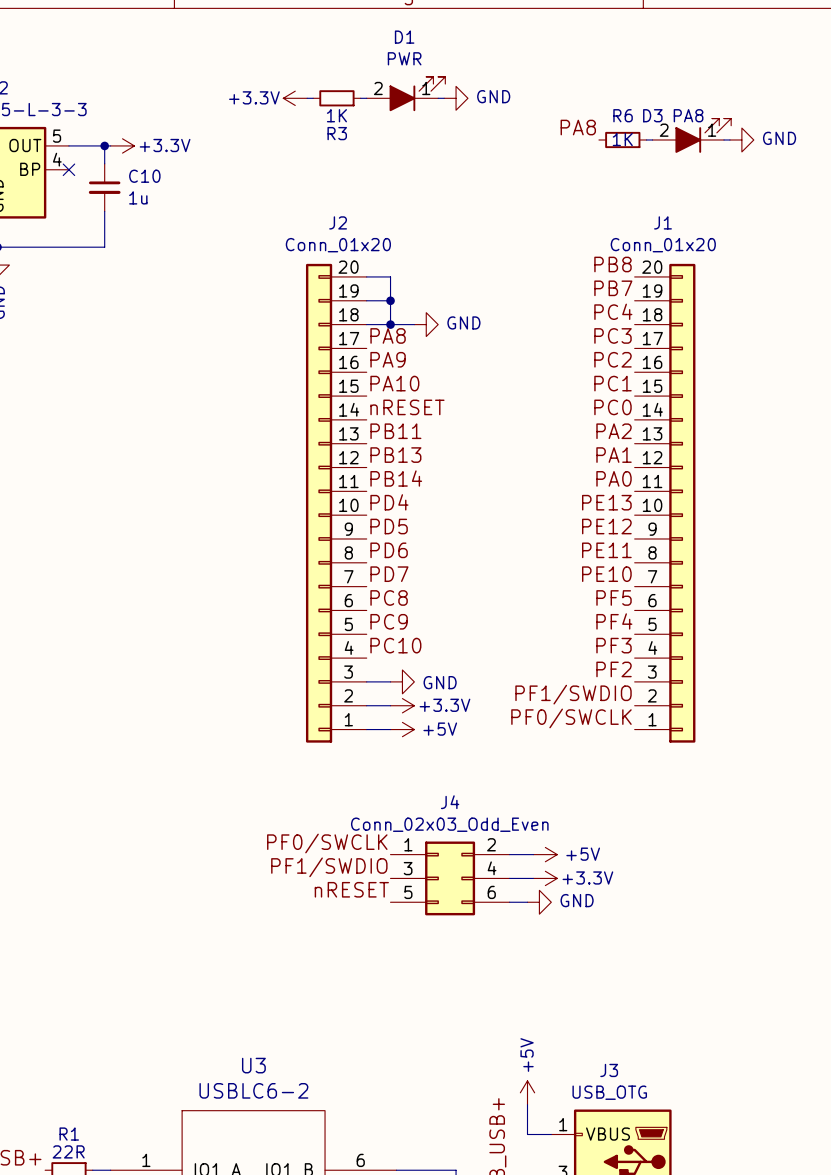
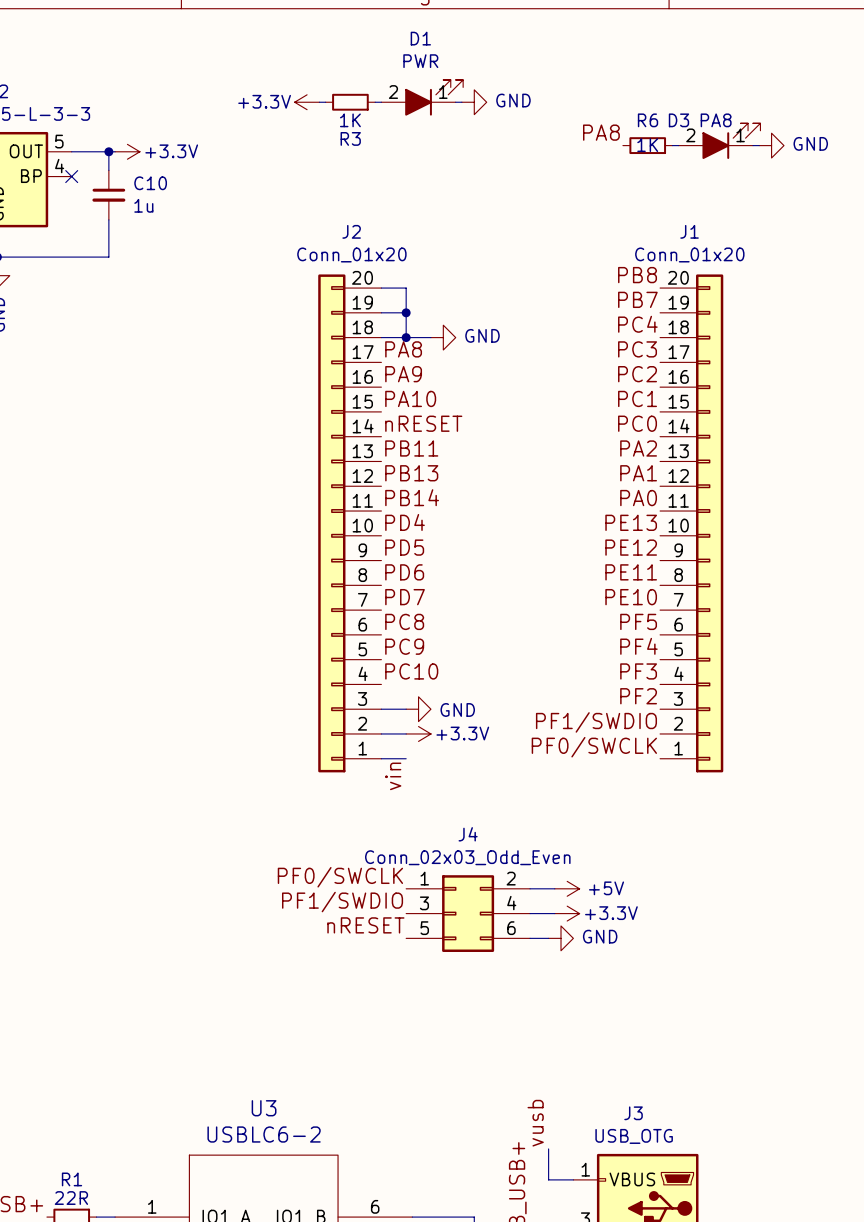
power symbol: +5V (402, 729) -> none
label: none -> vin (393, 776)
label: none -> vusb (535, 1123)
power symbol: +5V (527, 1092) -> none

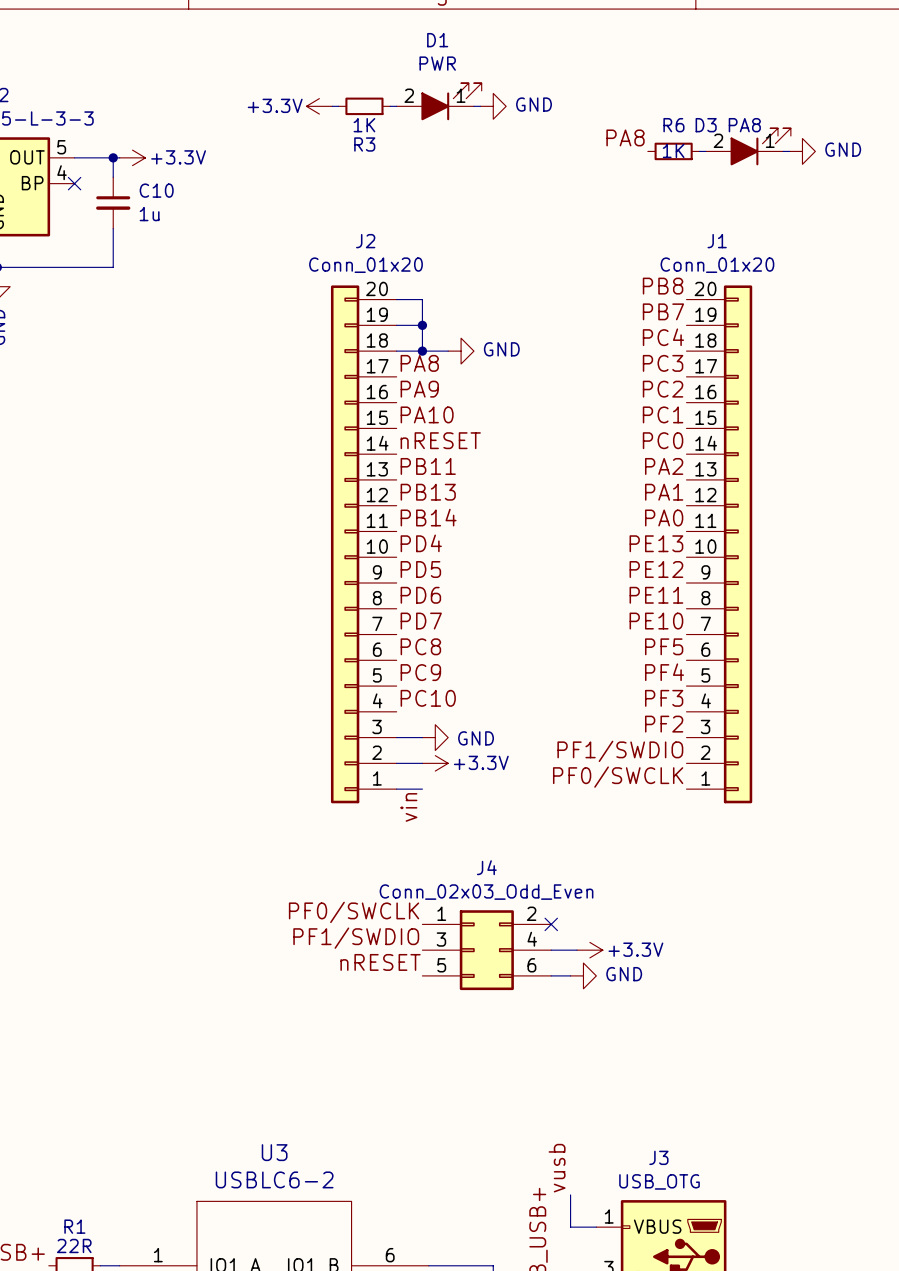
wire: (530, 888) (554, 888) -> none
no-connect mark: none -> (551, 924)
power symbol: +5V (567, 888) -> none

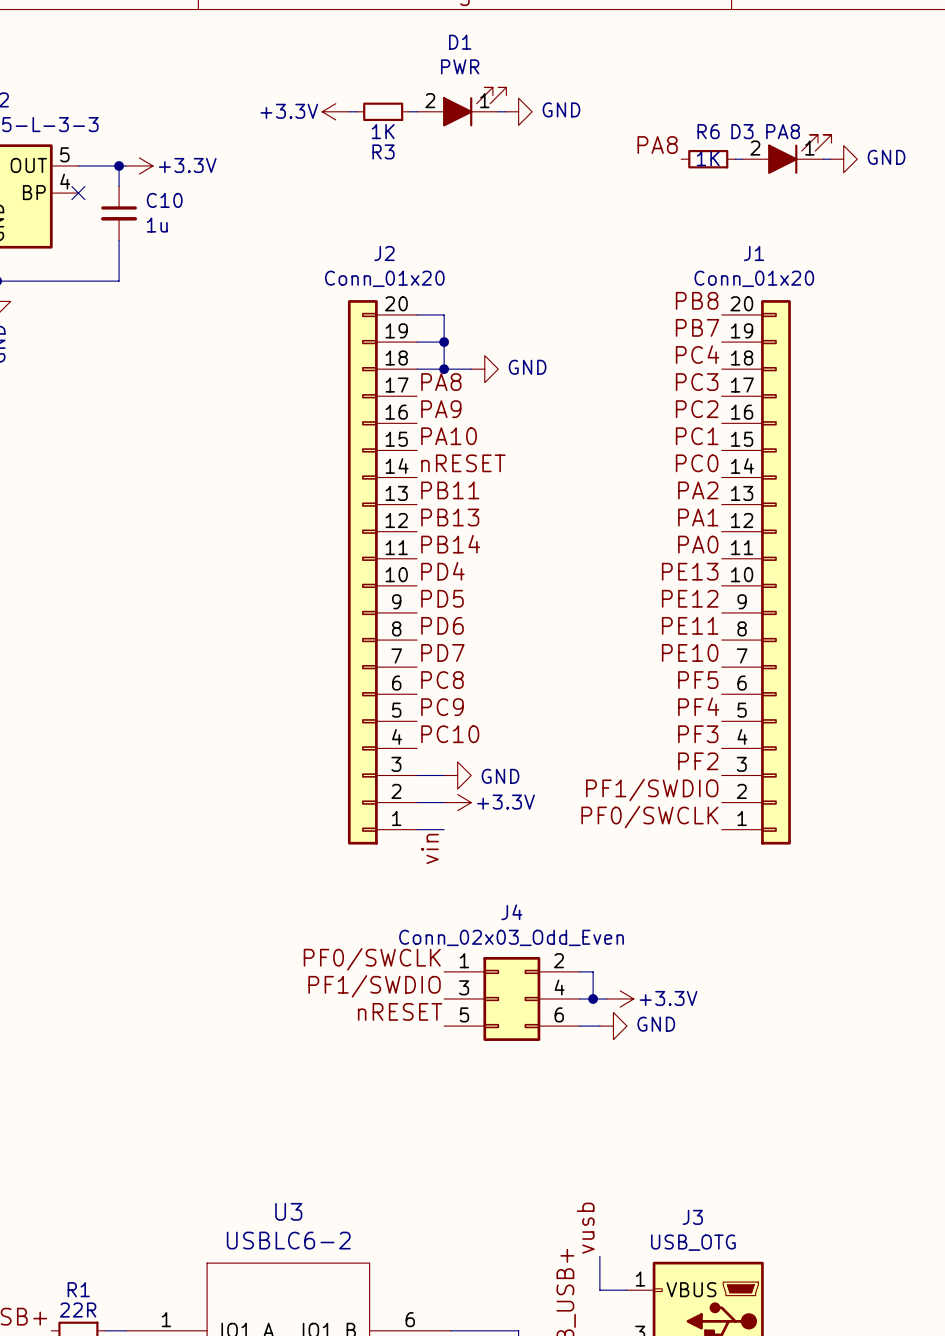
wire: none -> (579, 971) (593, 971) (593, 998)
no-connect mark: (551, 924) -> none
junction: none -> (593, 998)

